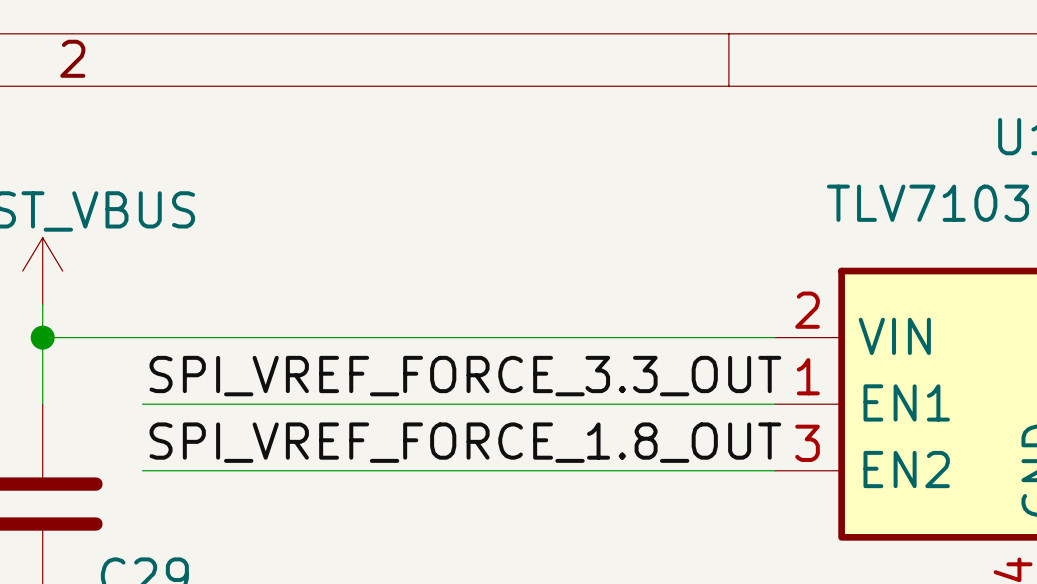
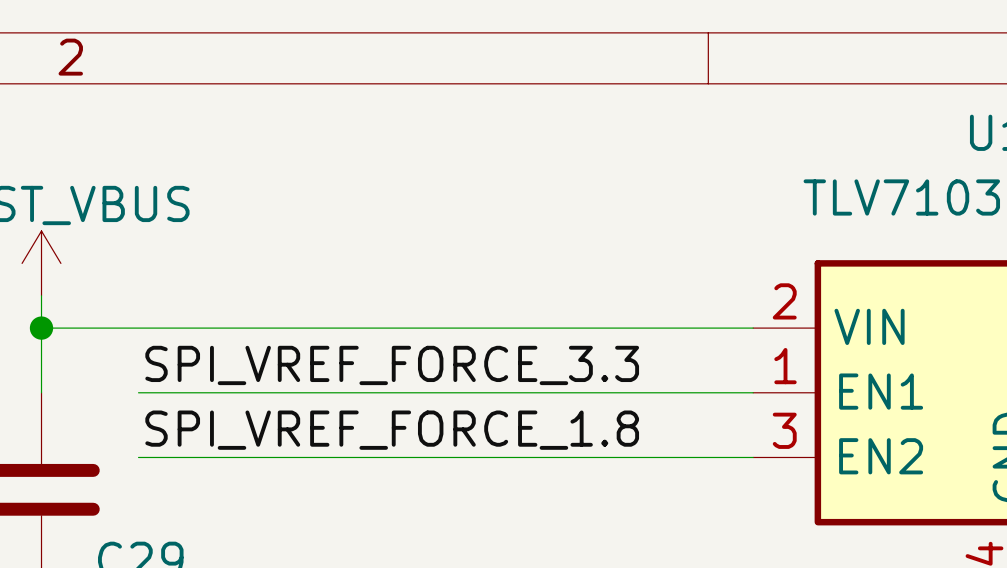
label: SPI_VREF_FORCE_3.3_OUT (465, 376) -> SPI_VREF_FORCE_3.3 (392, 365)
label: SPI_VREF_FORCE_1.8_OUT (465, 442) -> SPI_VREF_FORCE_1.8 (392, 430)

